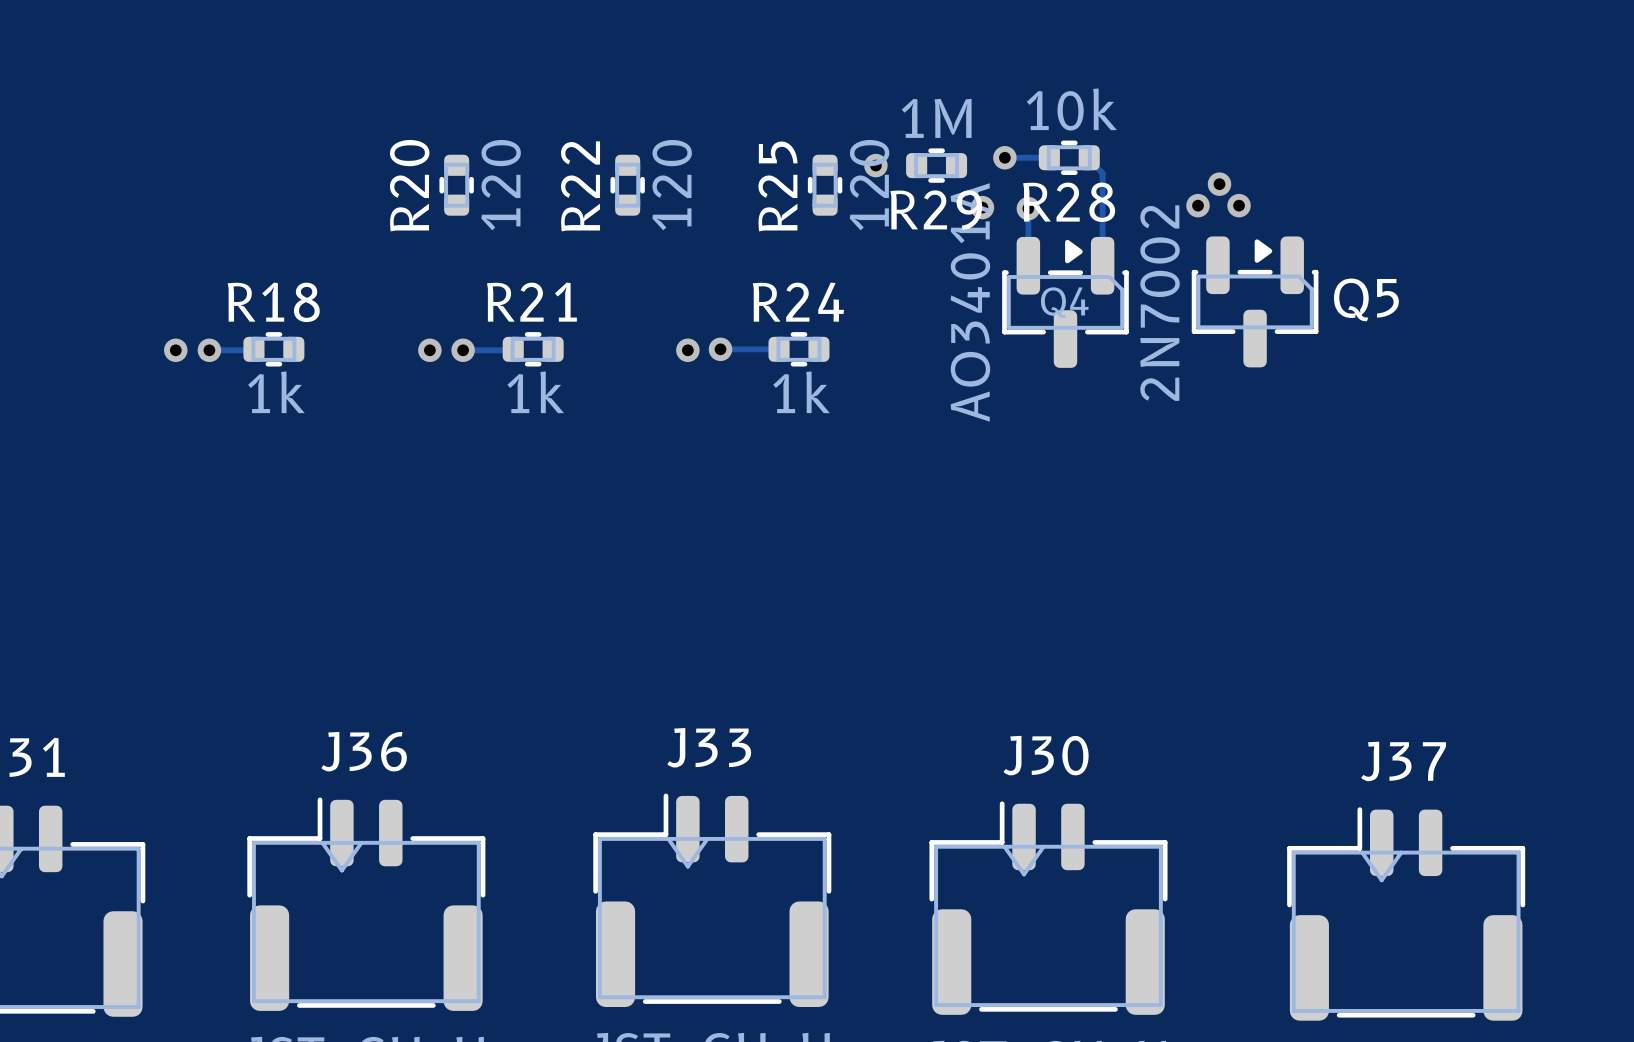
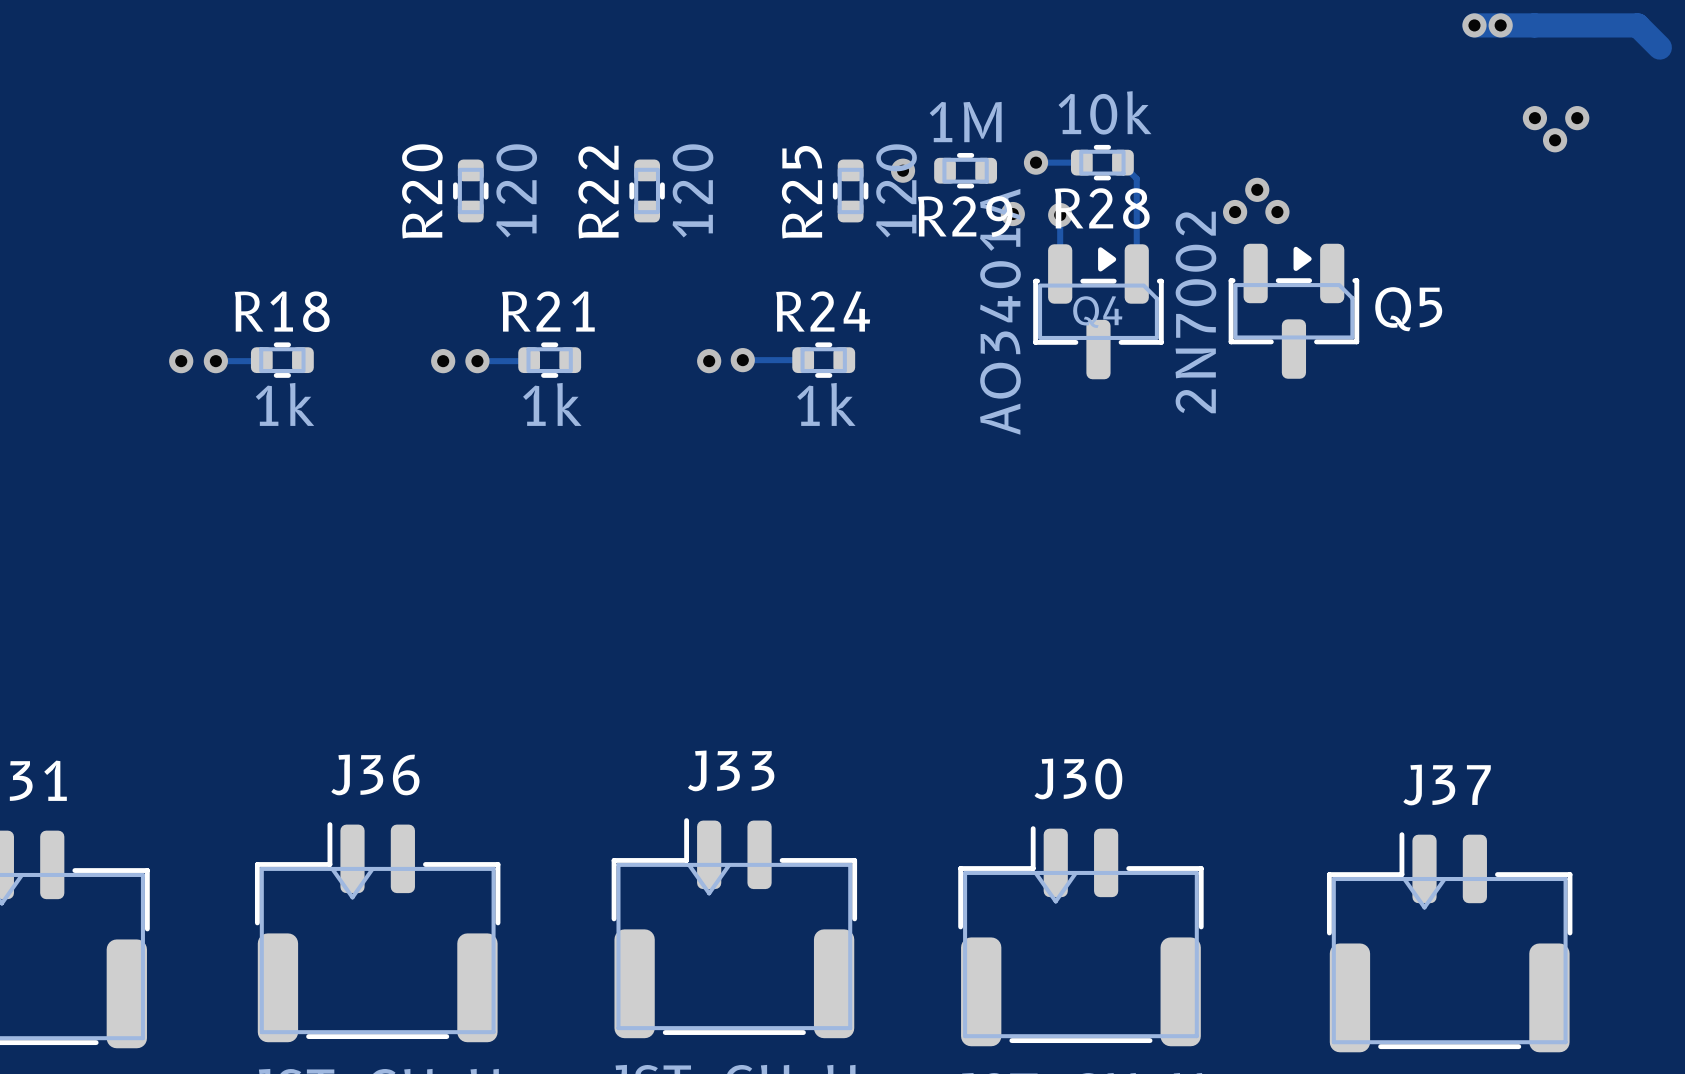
track: none -> (1474, 25) (1637, 25) (1659, 47)
via: none -> (1474, 25)
via: none -> (1500, 25)
via: none -> (1534, 118)
via: none -> (1577, 118)
via: none -> (1555, 140)

